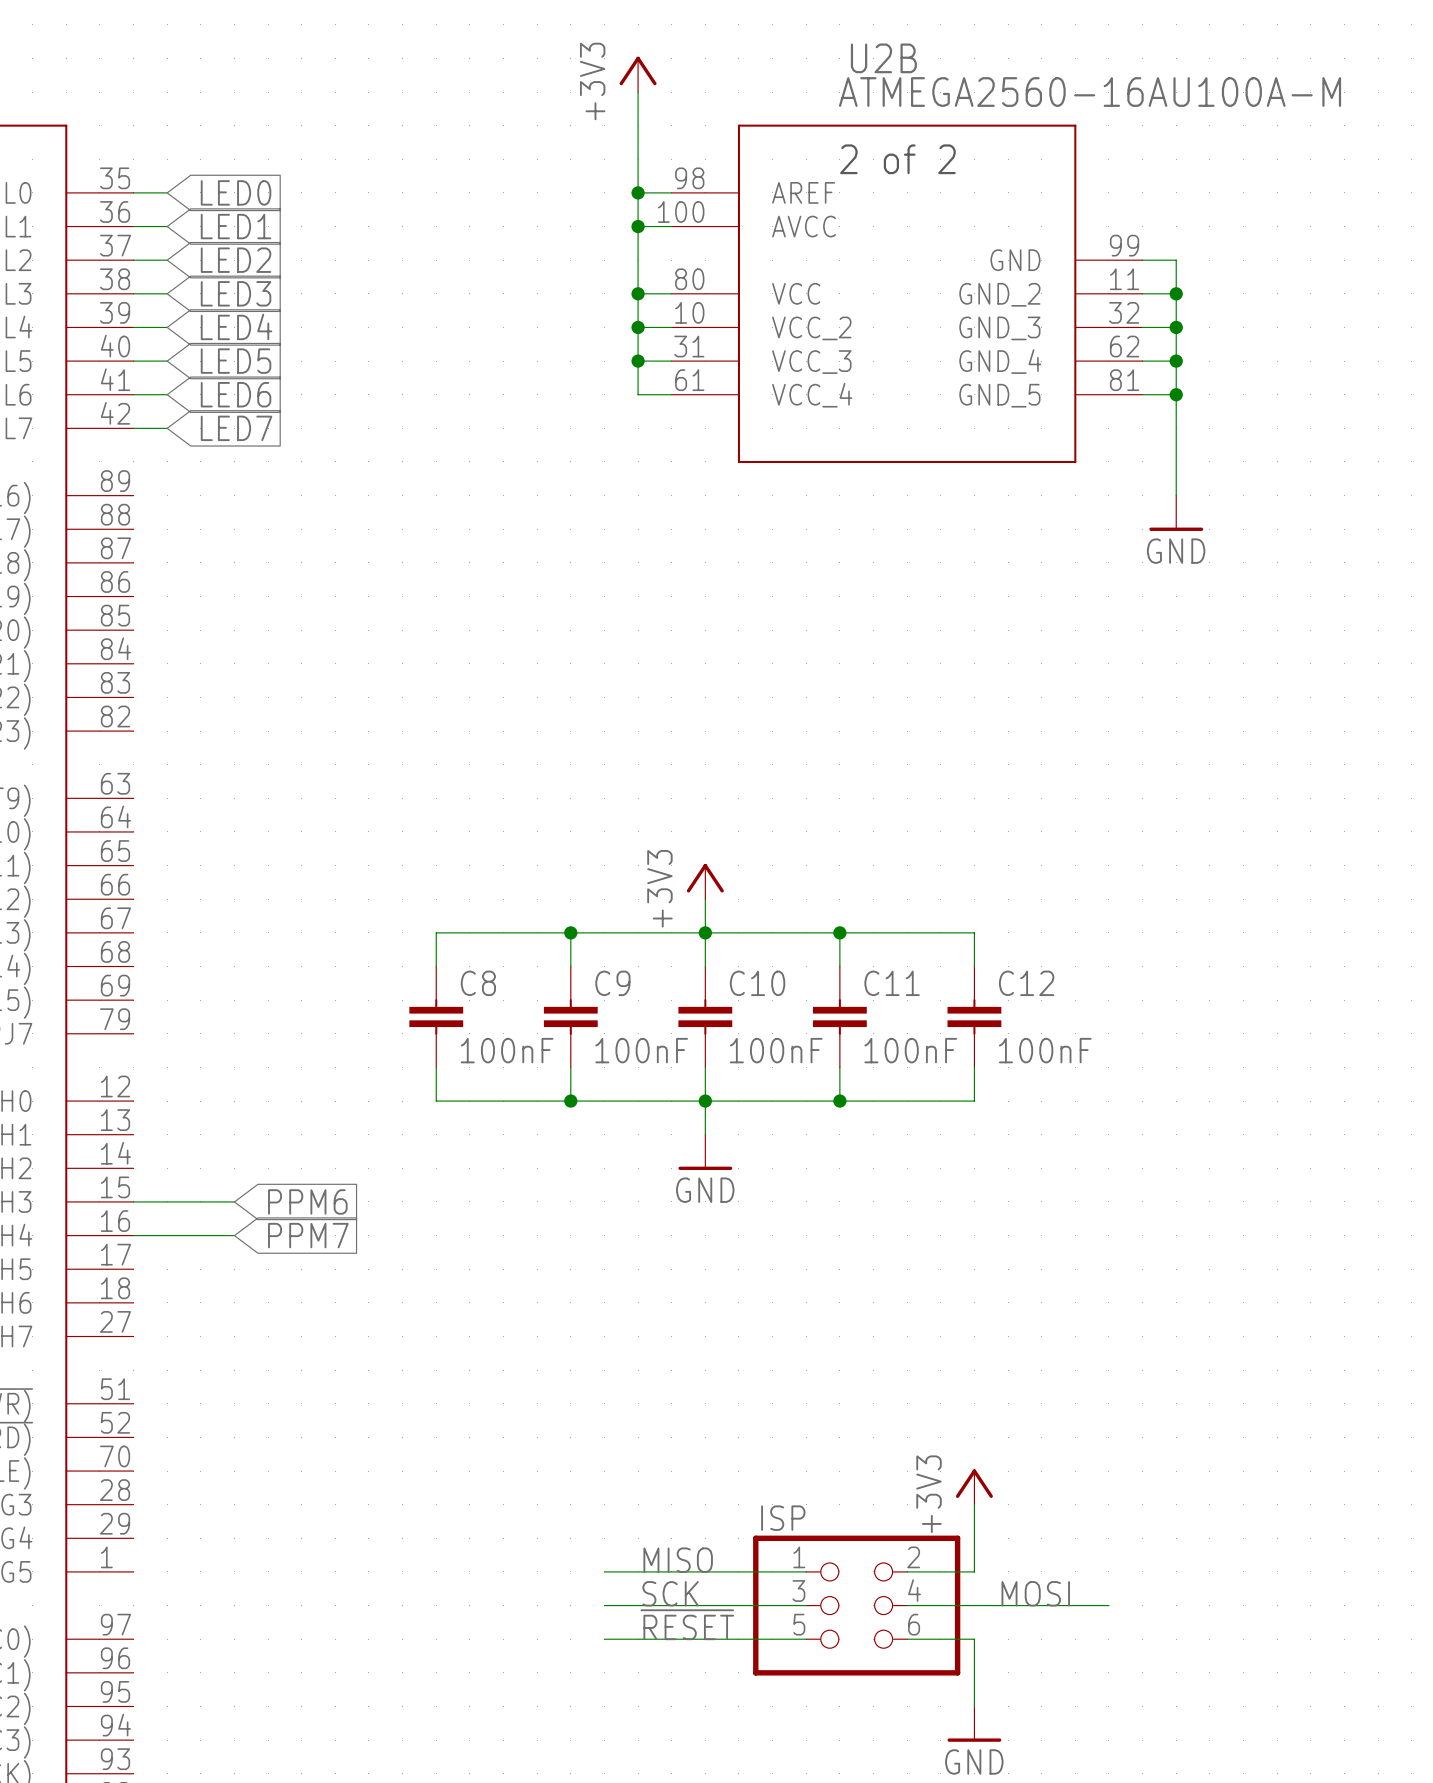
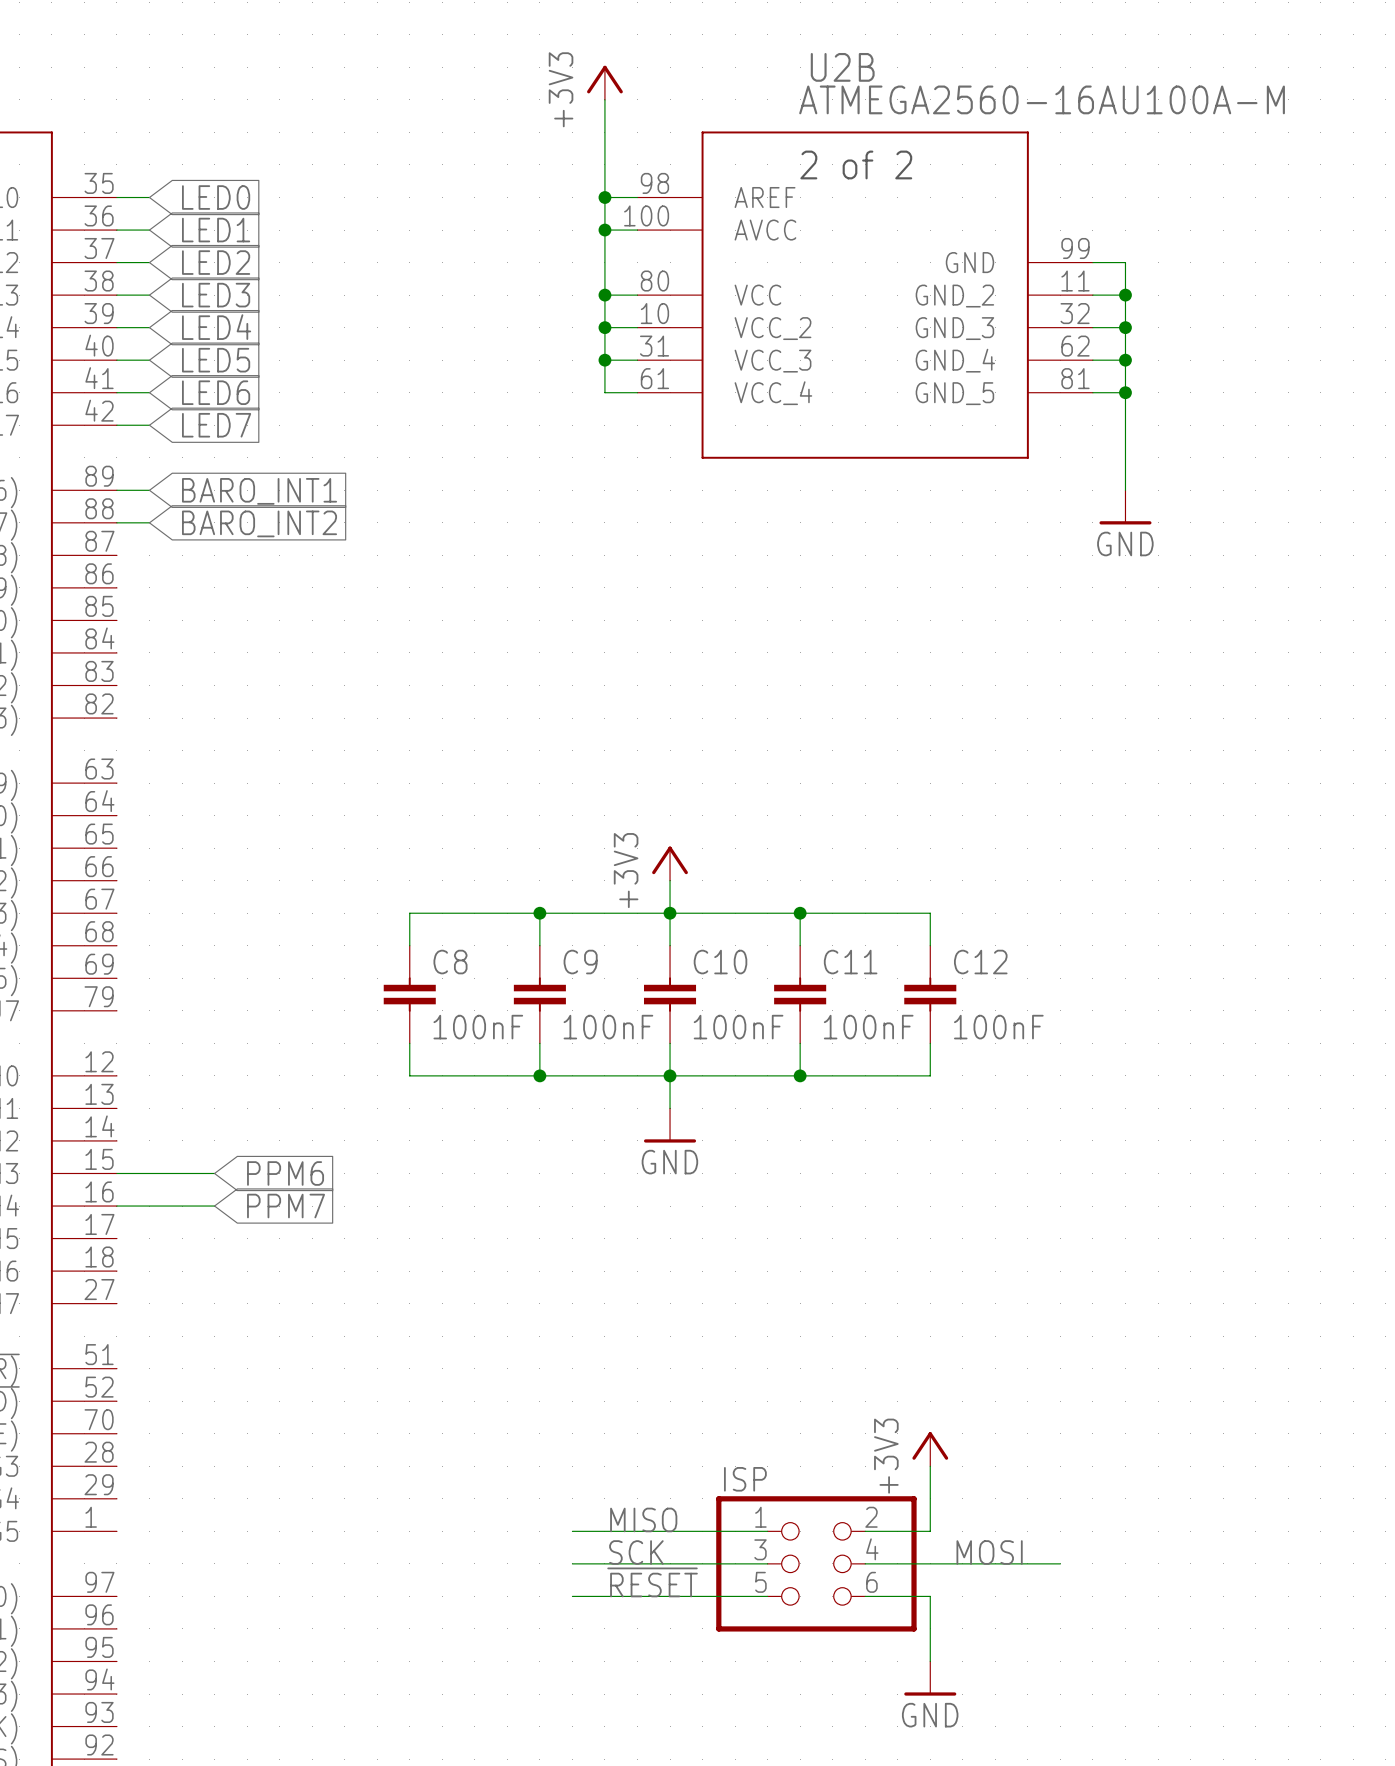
wire: none -> (116, 490) (149, 490)
global label: none -> BARO_INT1 (259, 491)
wire: none -> (116, 522) (149, 522)
global label: none -> BARO_INT2 (259, 523)

